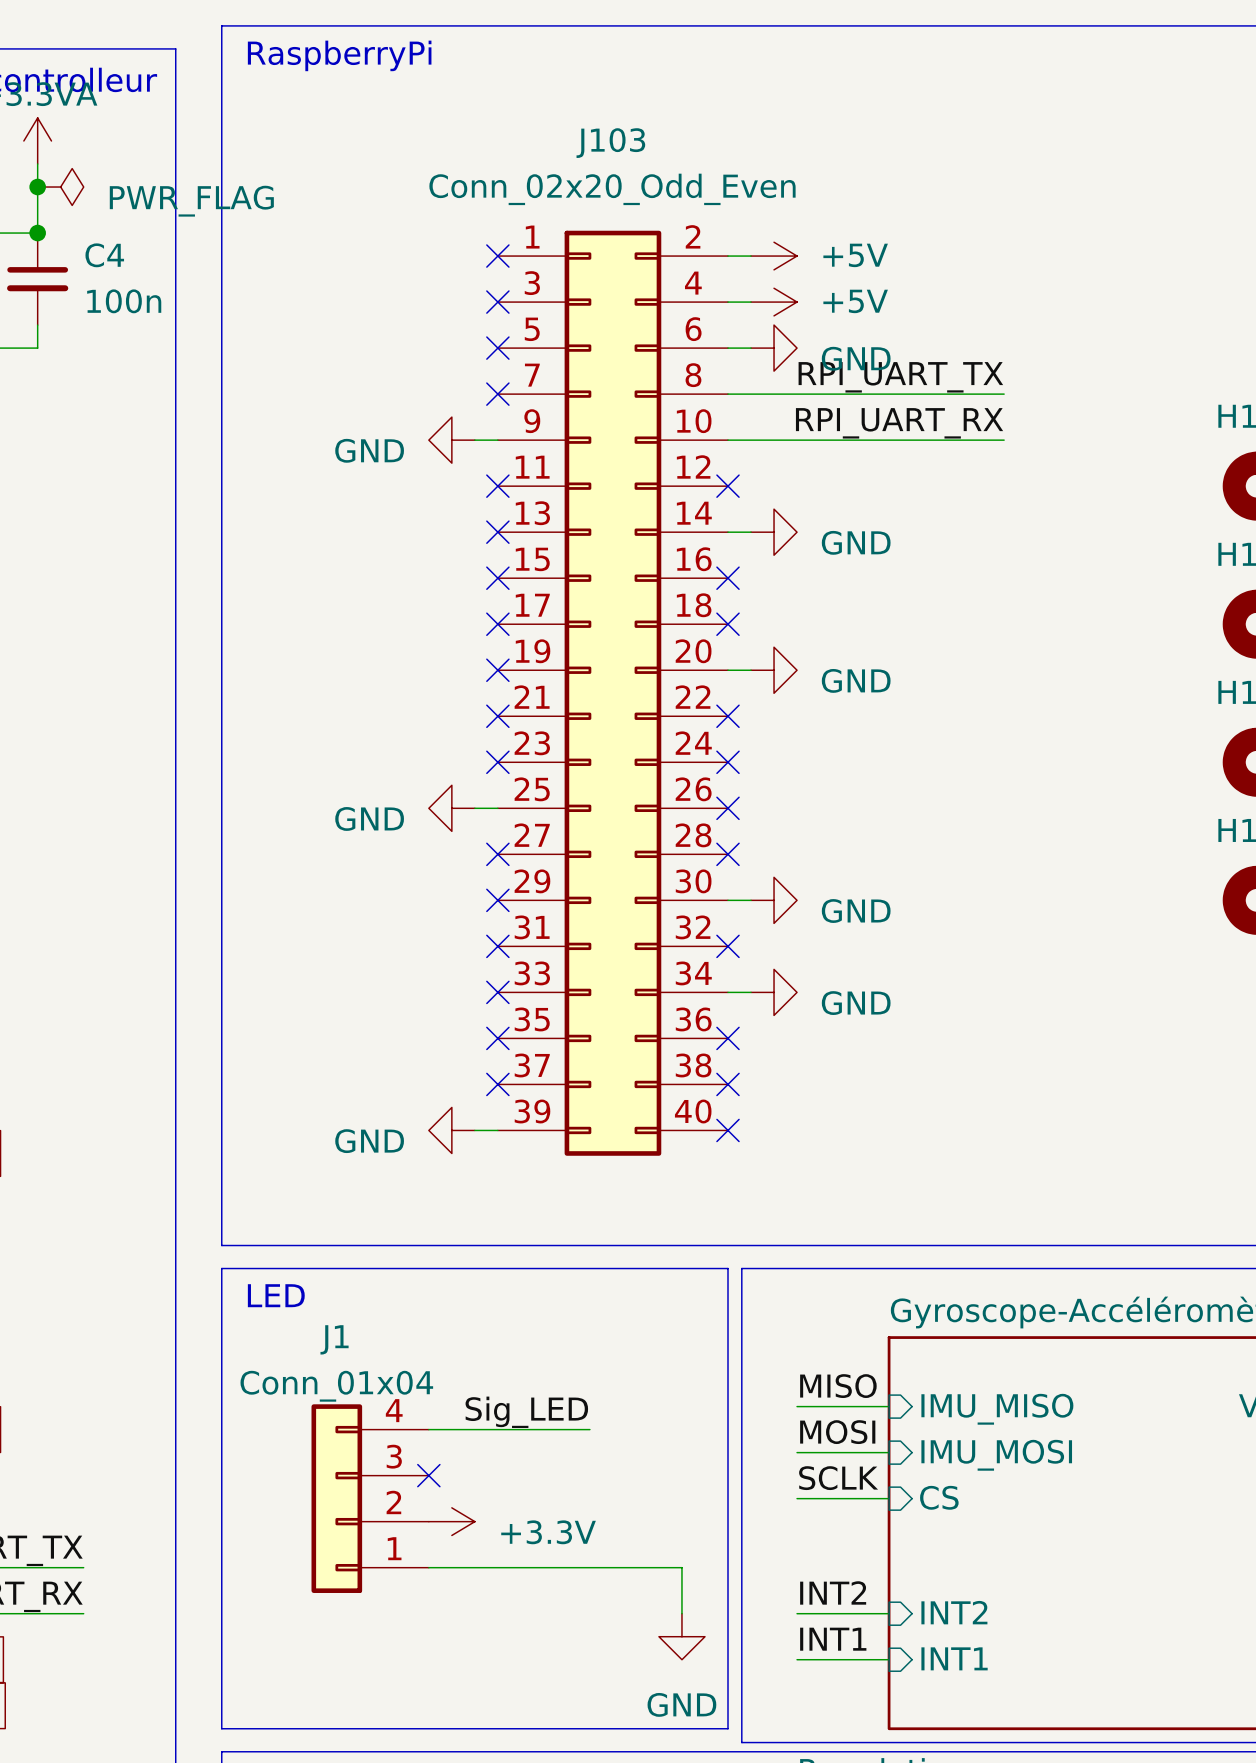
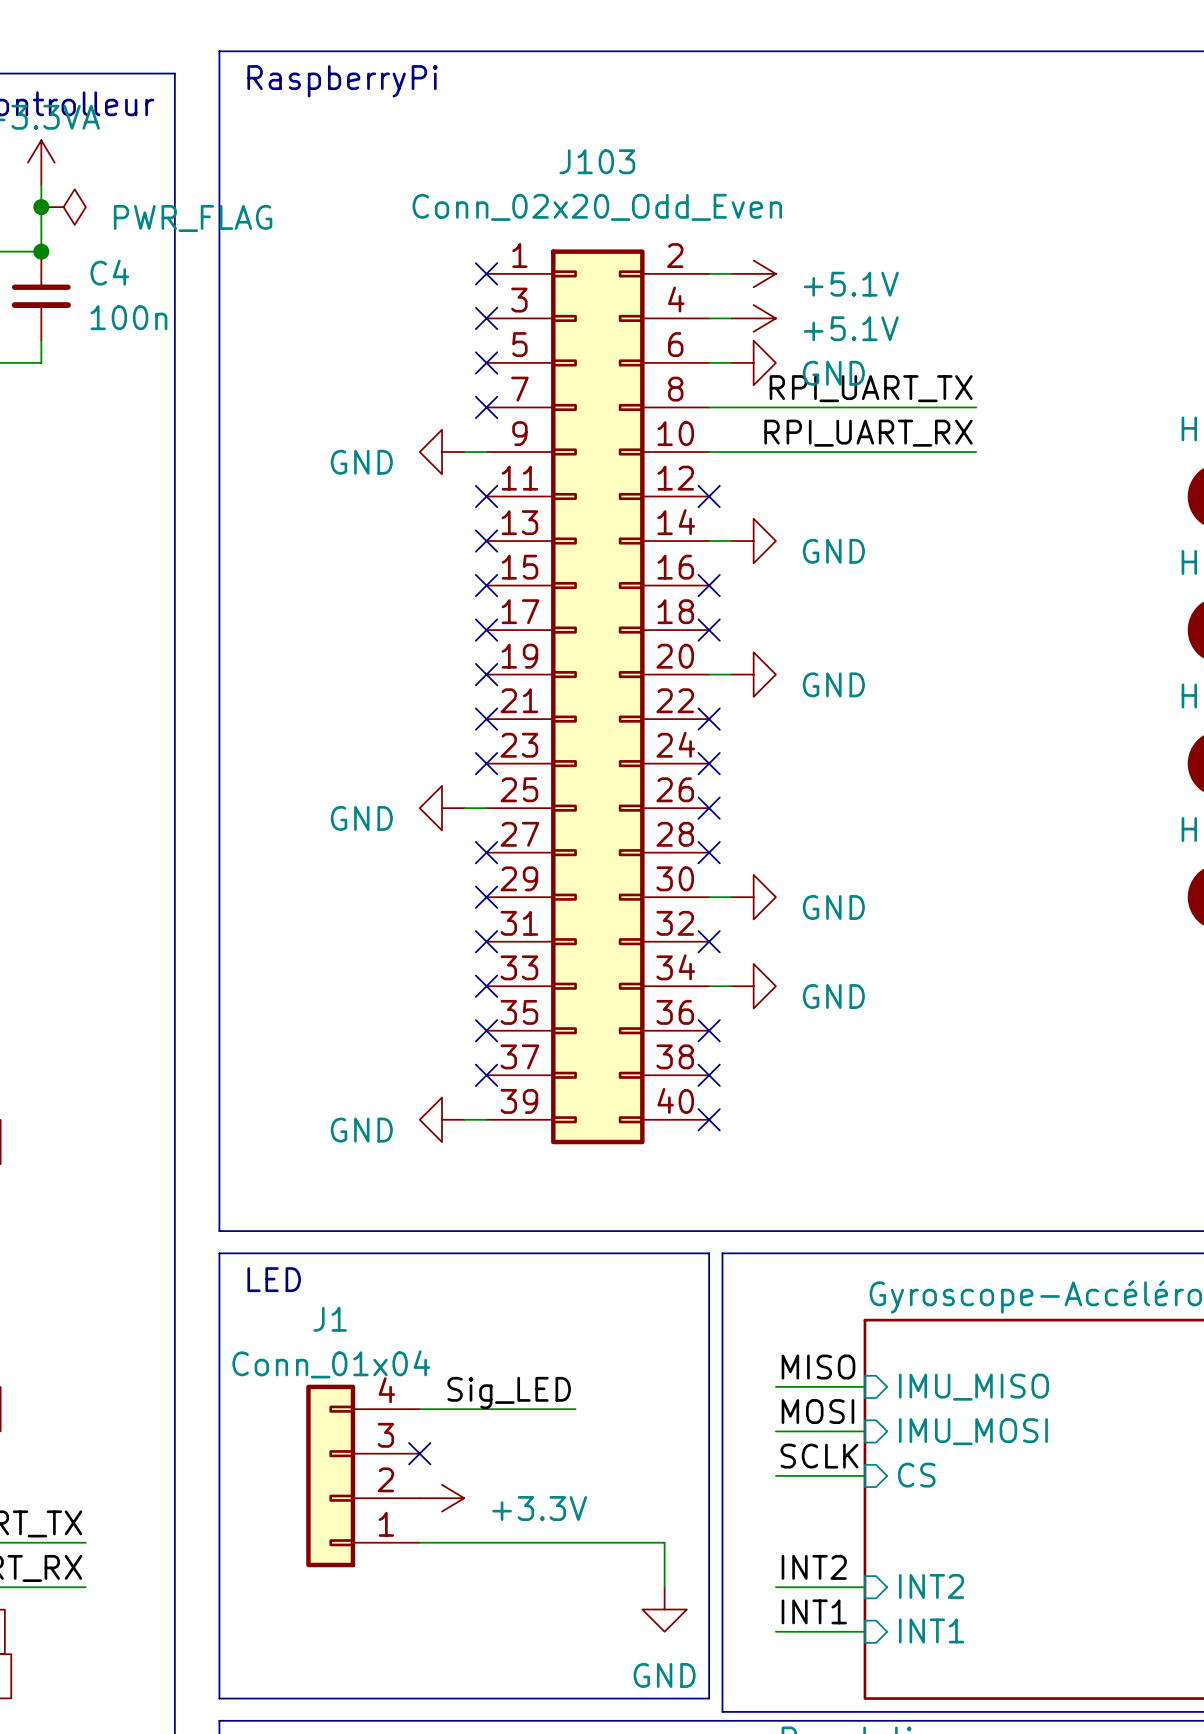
power symbol: +5V (774, 256) -> +5.1V (753, 273)
power symbol: +5V (774, 302) -> +5.1V (753, 318)

